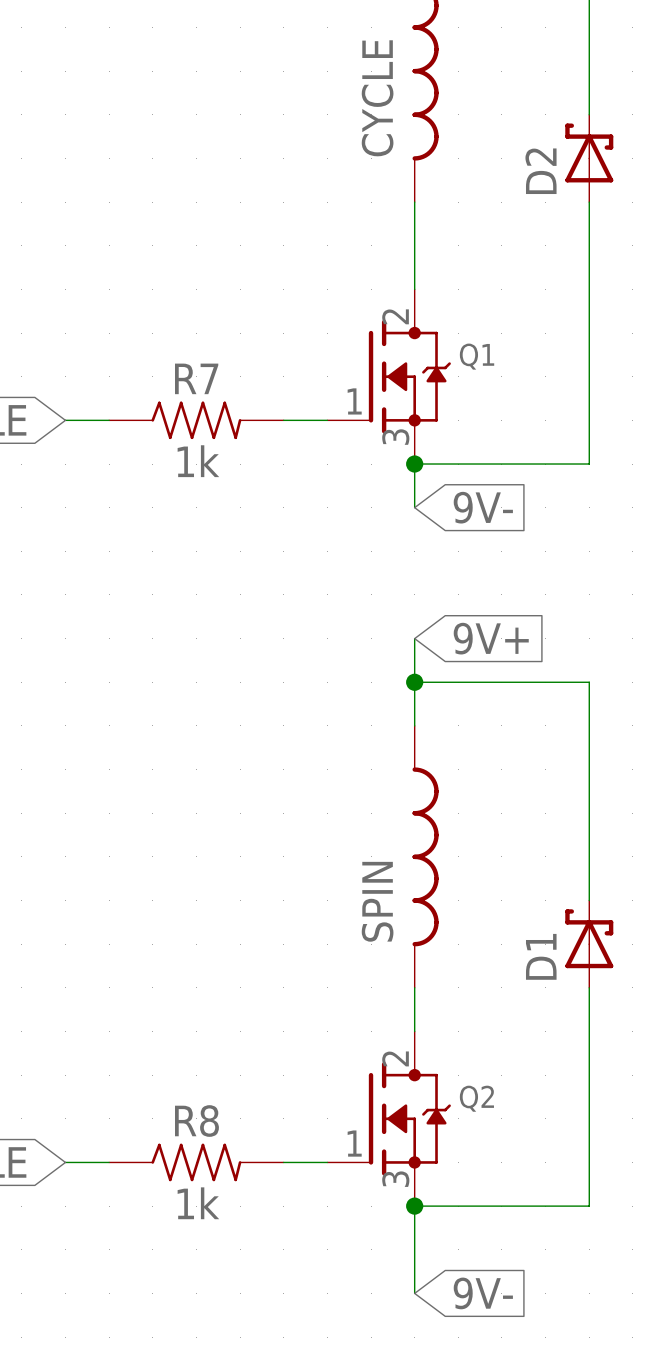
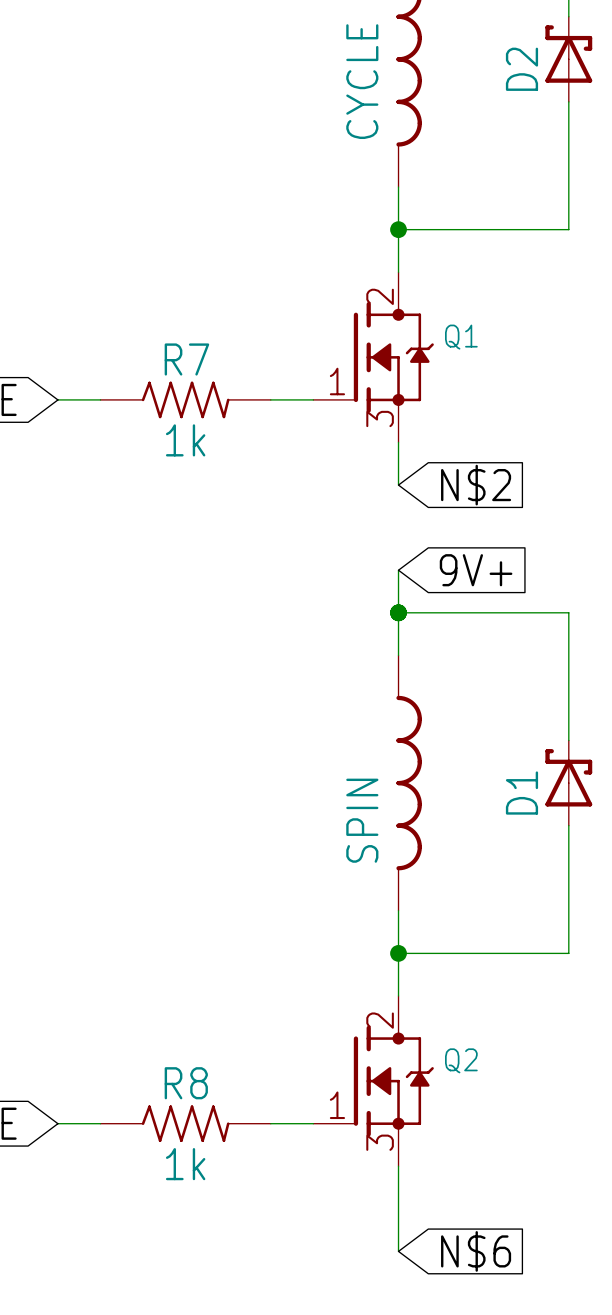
D2 position: (589, 158) -> (568, 59)
junction: none -> (398, 229)
wire: (589, 245) (589, 464) (414, 464) -> (568, 229) (398, 229)
junction: (414, 464) -> none
global label: 9V- (483, 507) -> N$2 (476, 485)
global label position: 9V+ (491, 638) -> 9V+ (476, 570)
junction position: (414, 682) -> (398, 612)
wire: (589, 682) (414, 682) (414, 725) -> (568, 655) (568, 612) (398, 612) (398, 570)
SPIN position: (425, 856) -> (409, 783)
wire: none -> (568, 868) (568, 953) (398, 953) (398, 910)
D1 position: (589, 944) -> (568, 783)
junction: none -> (398, 953)
wire: (589, 987) (589, 1206) (414, 1206) -> none
junction: (414, 1206) -> none
global label: 9V- (483, 1293) -> N$6 (476, 1251)

